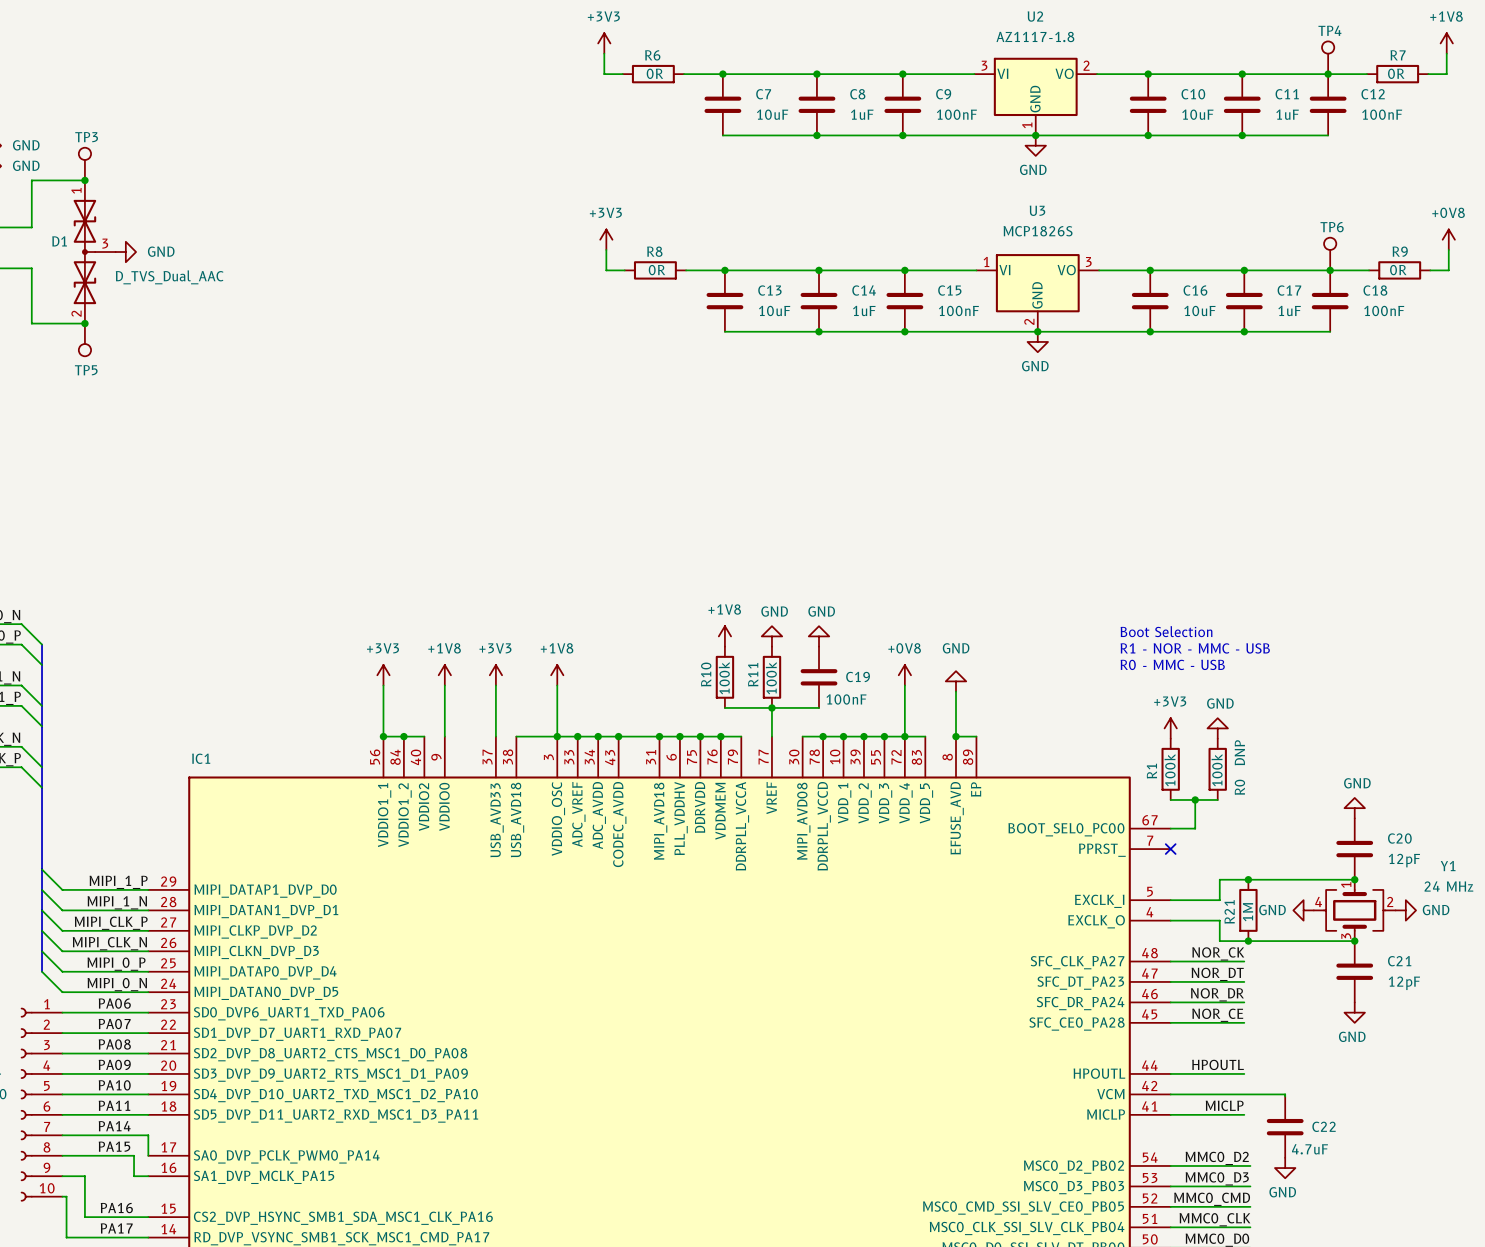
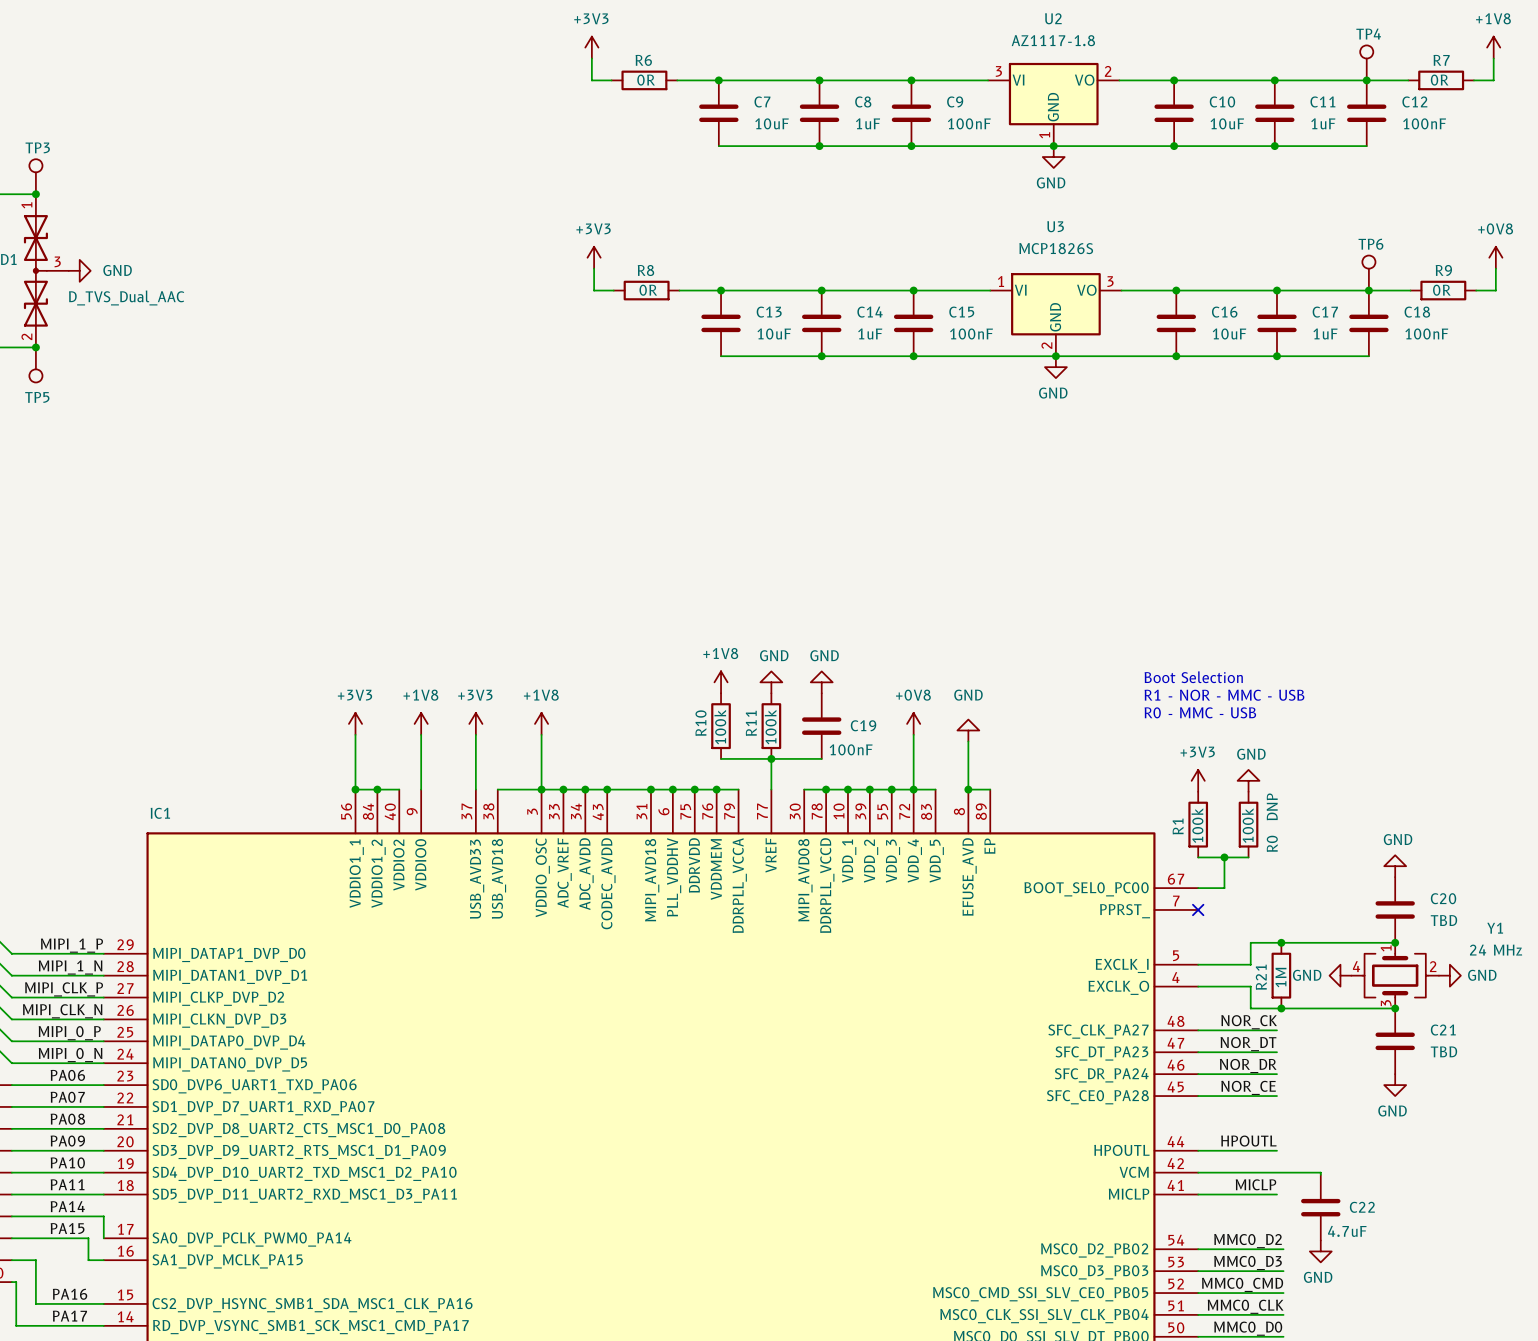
C20 value: 12pF (1404, 860) -> TBD (1443, 920)
C21 value: 12pF (1404, 983) -> TBD (1443, 1051)

